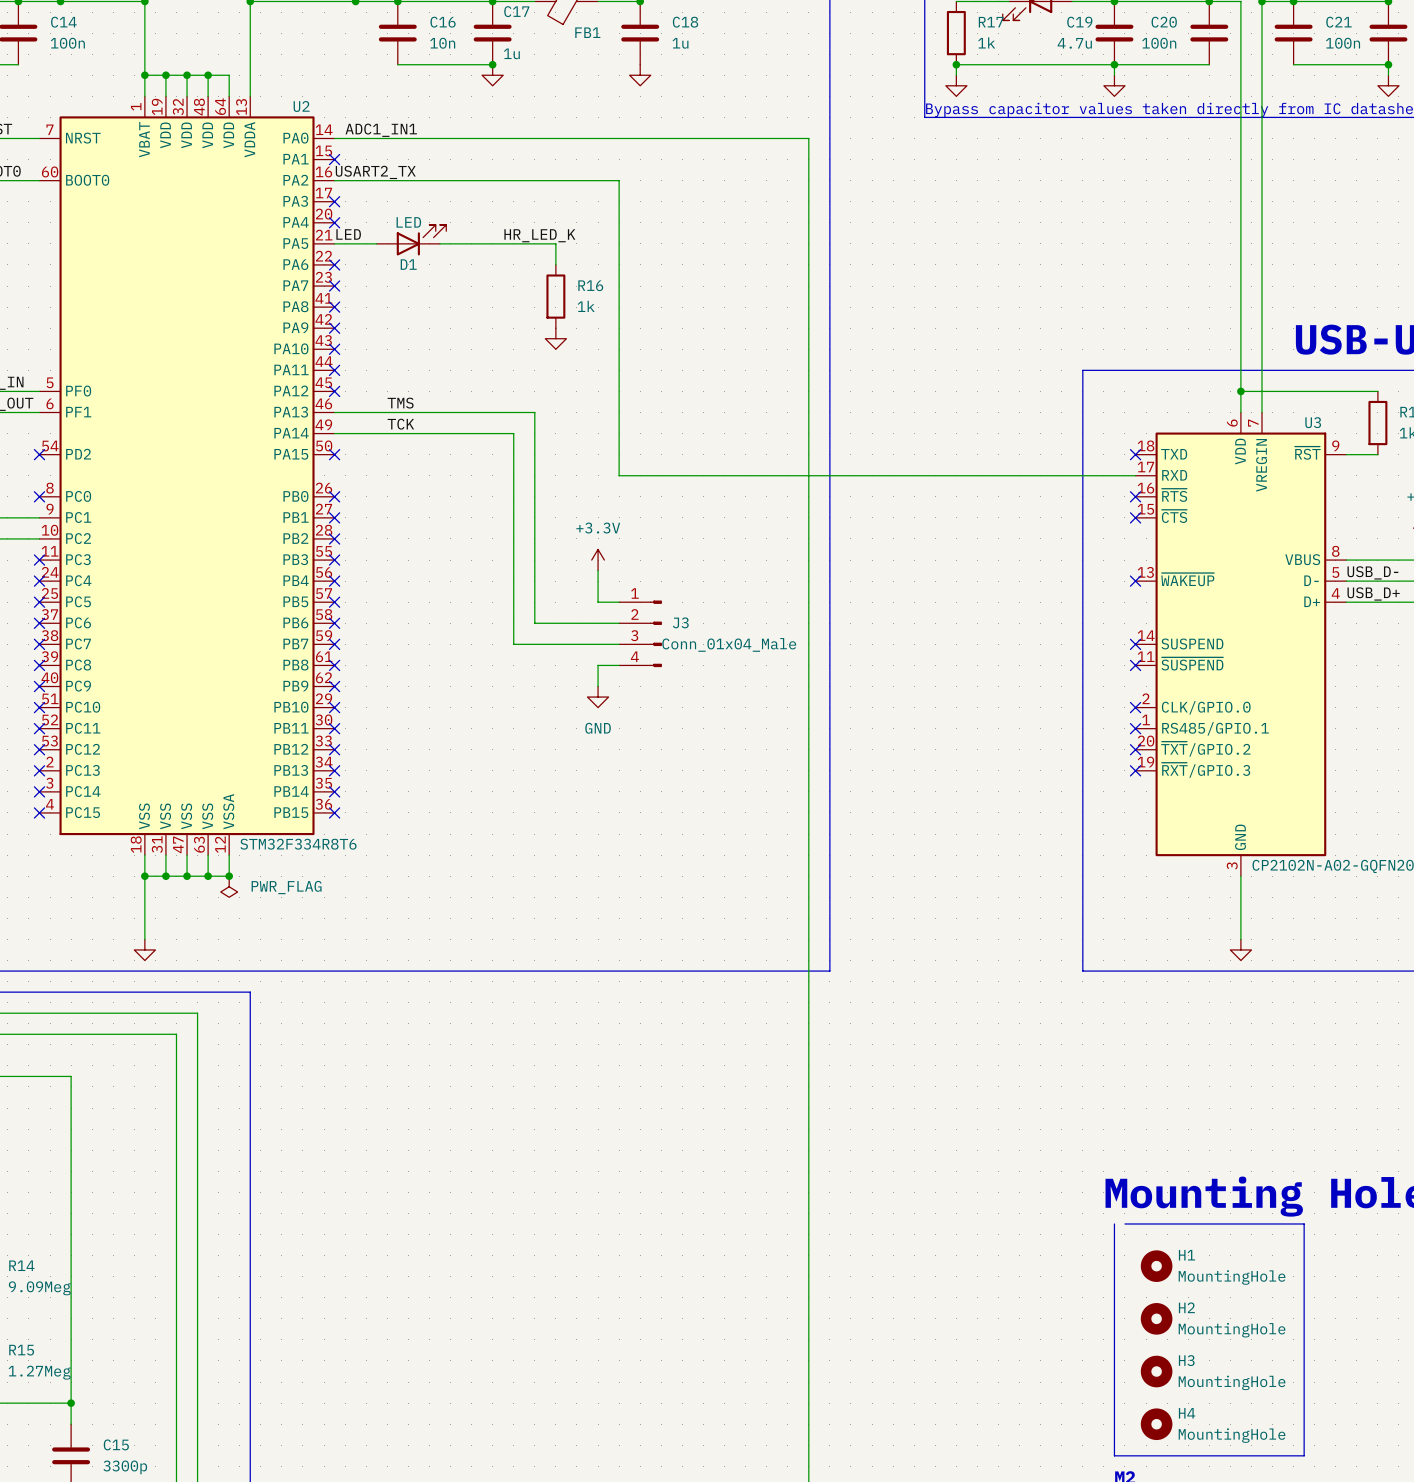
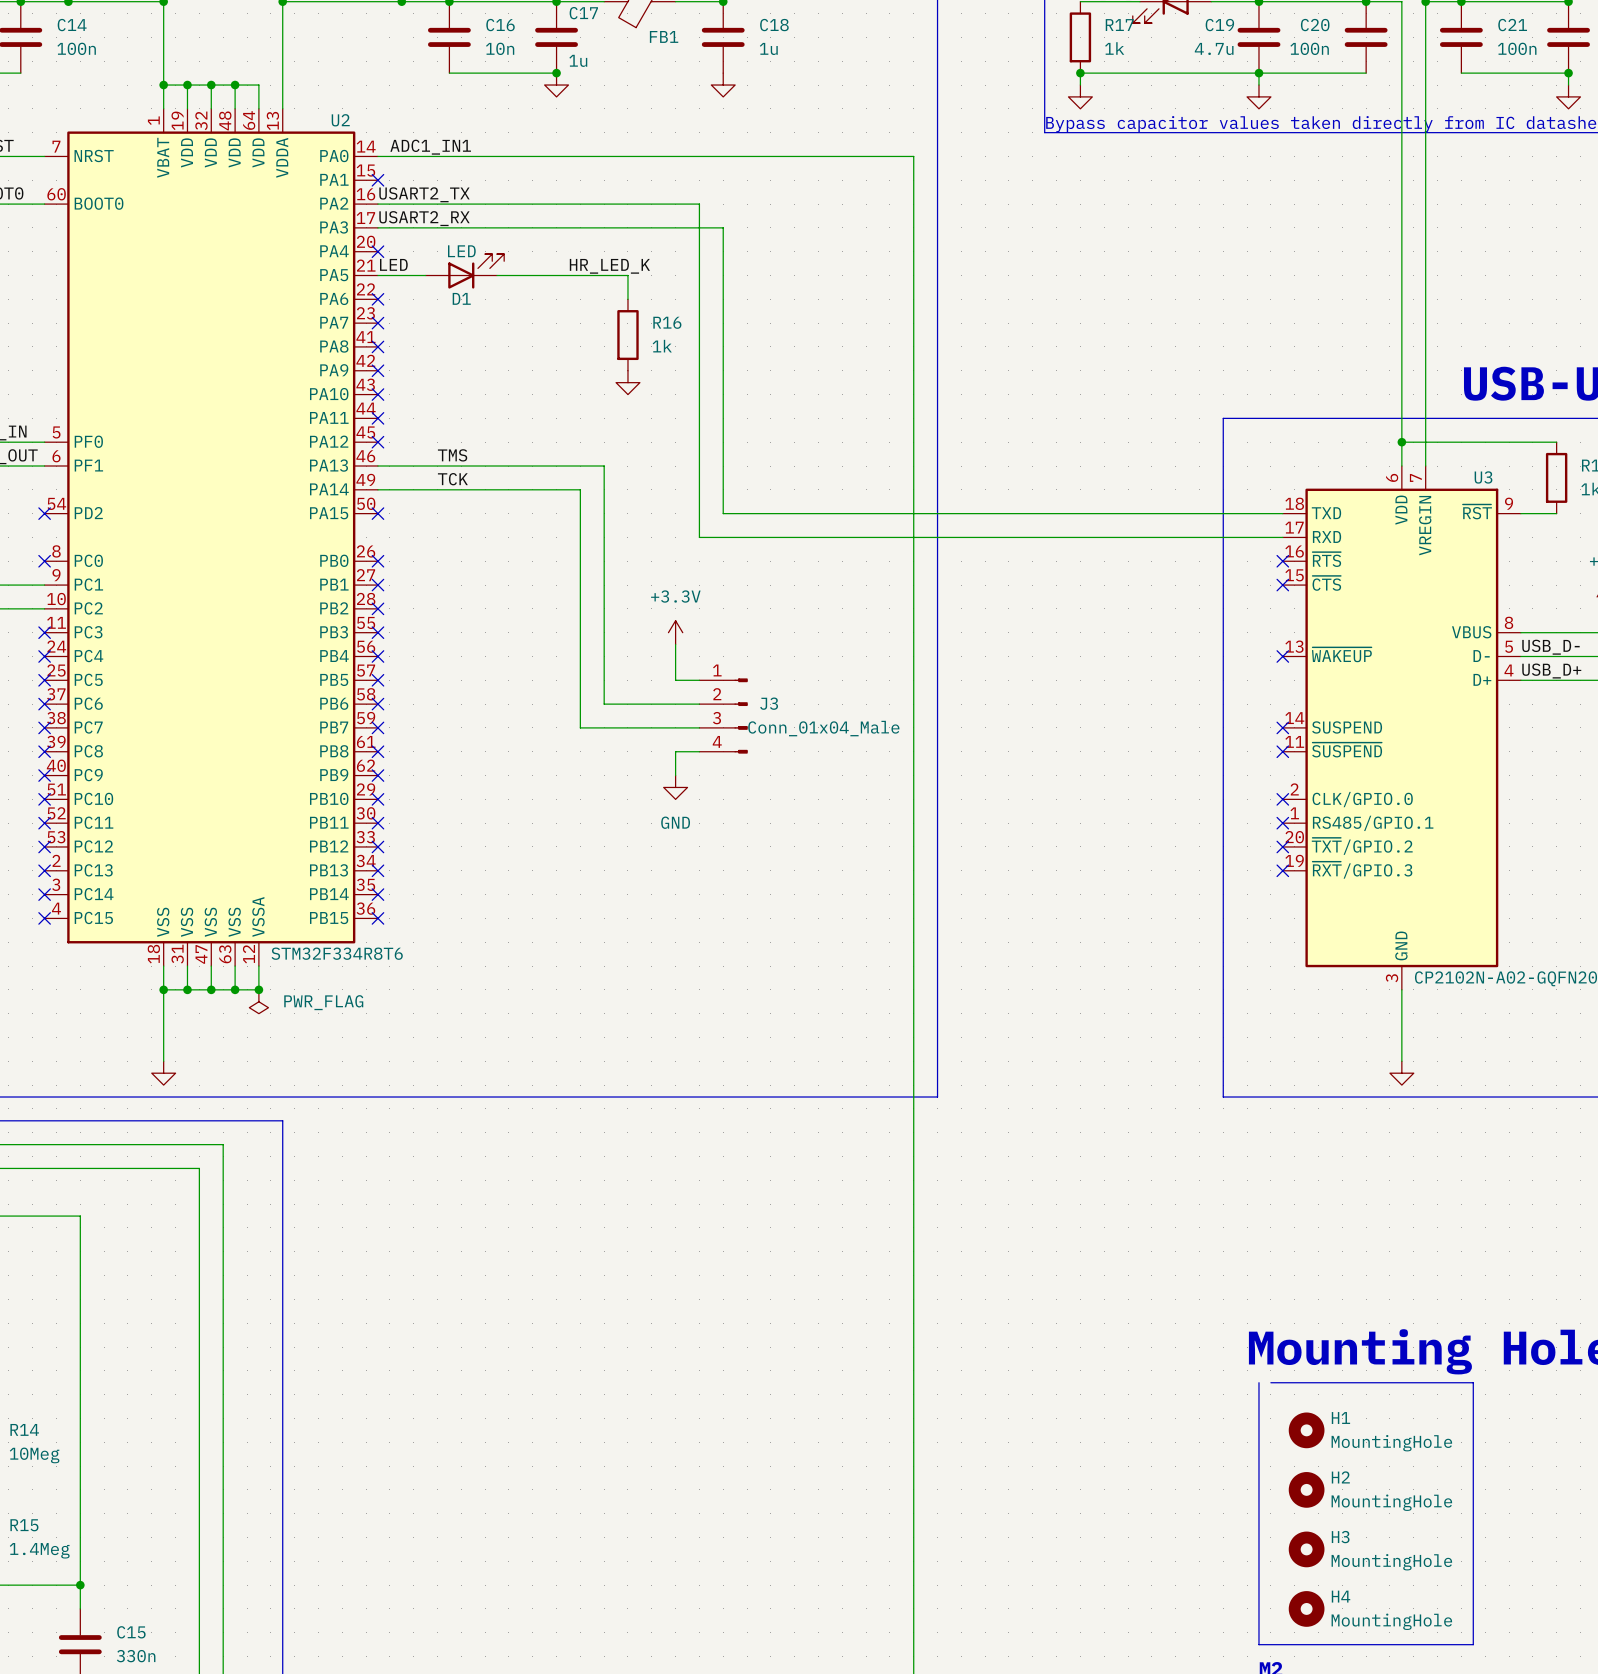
label: none -> USART2_RX (424, 218)
wire: none -> (377, 227) (723, 227) (723, 513) (1282, 513)
no-connect mark: (334, 201) -> none
no-connect mark: (1135, 454) -> none
R14 value: 9.09Meg (39, 1288) -> 10Meg (34, 1455)
R15 value: 1.27Meg (39, 1372) -> 1.4Meg (39, 1550)
C15 value: 3300p (125, 1467) -> 330n (136, 1656)

